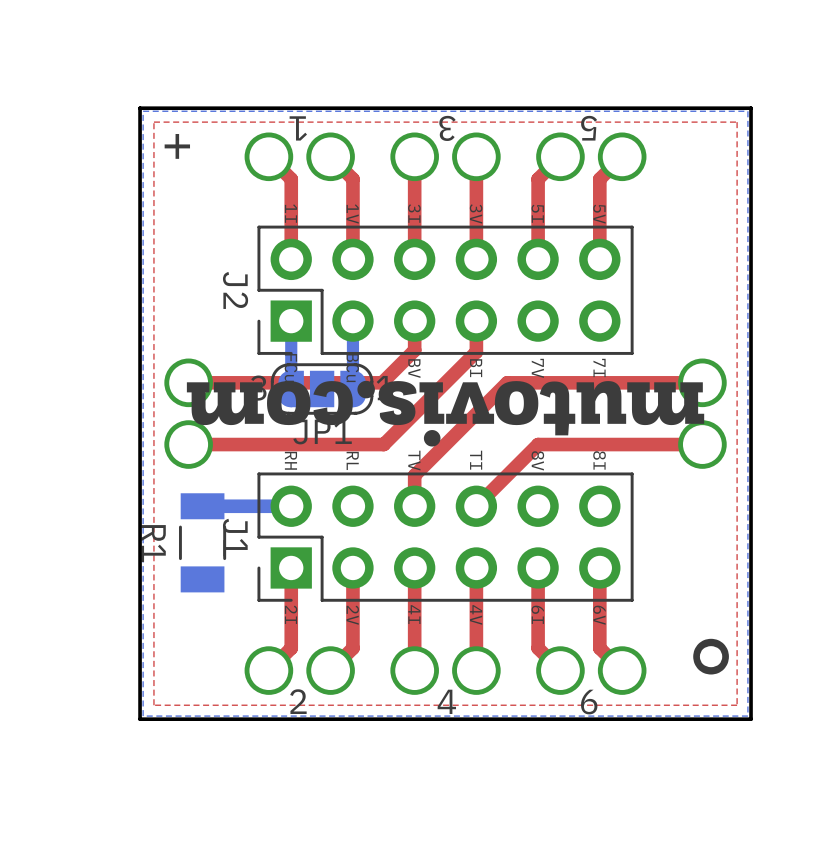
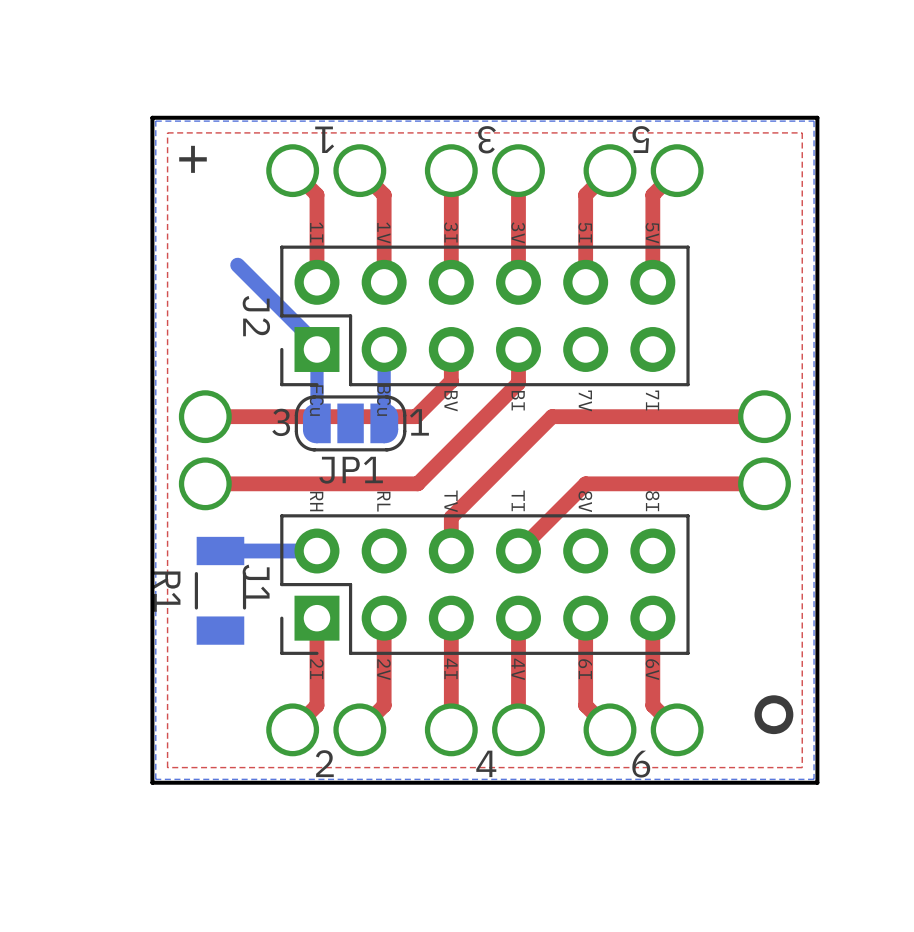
bottom track: none -> (237, 265) (316, 344)
drawing: [186, 380, 705, 447] -> none

